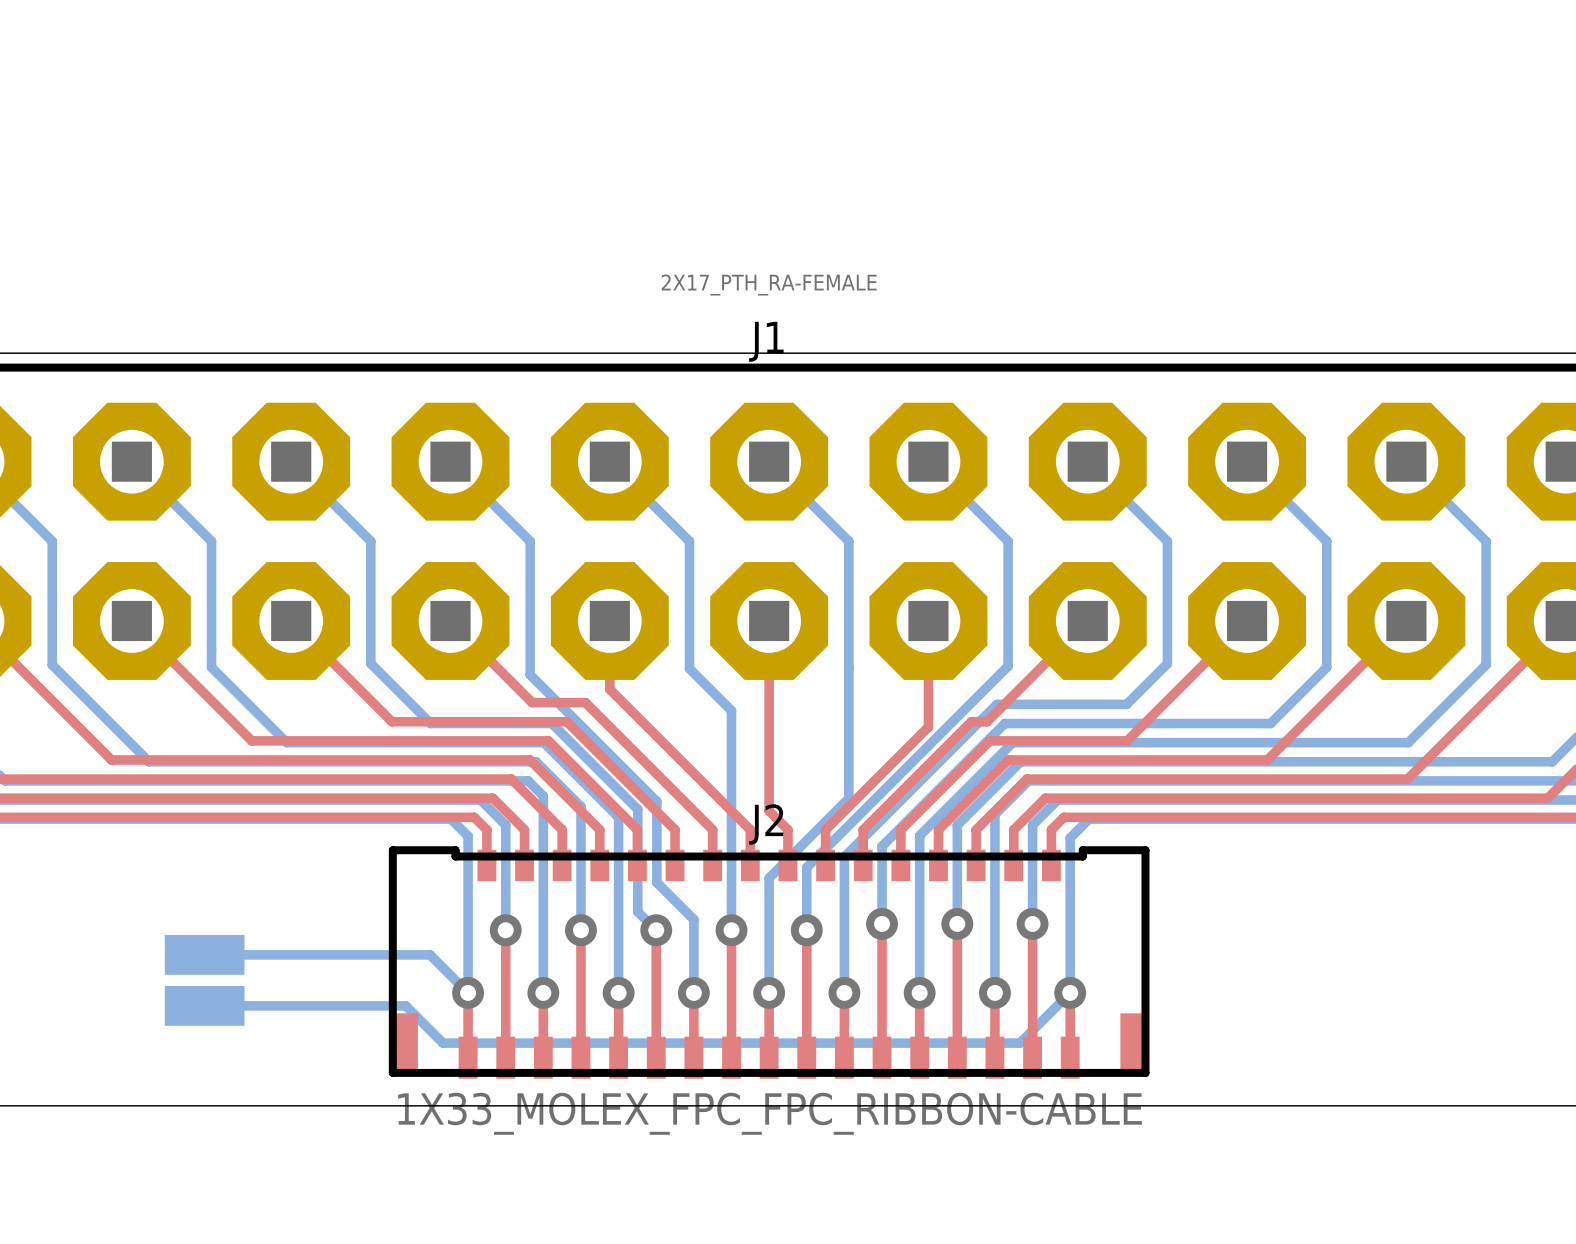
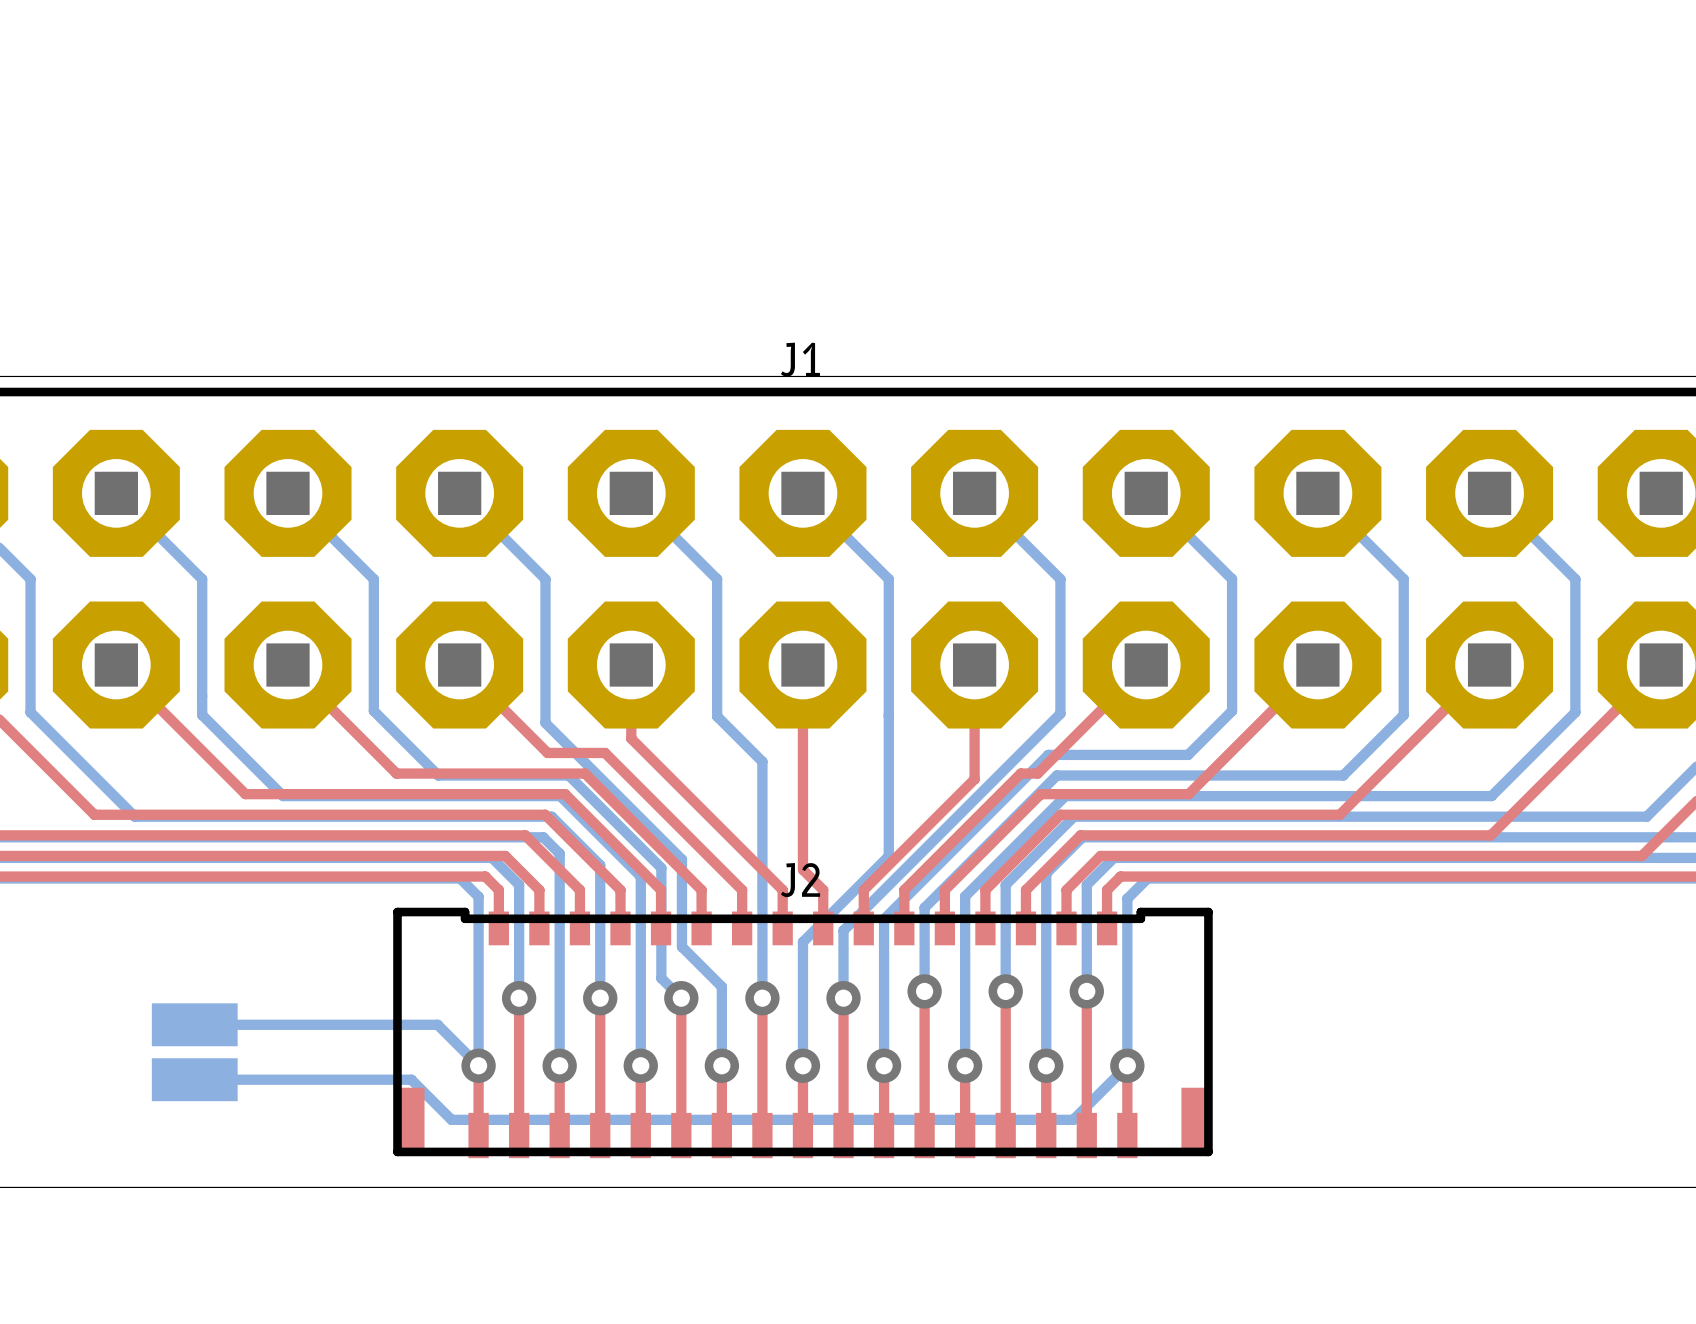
J1 value: 2X17_PTH_RA-FEMALE (769, 285) -> none
J2 value: 1X33_MOLEX_FPC_FPC_RIBBON-CABLE (770, 1113) -> none

